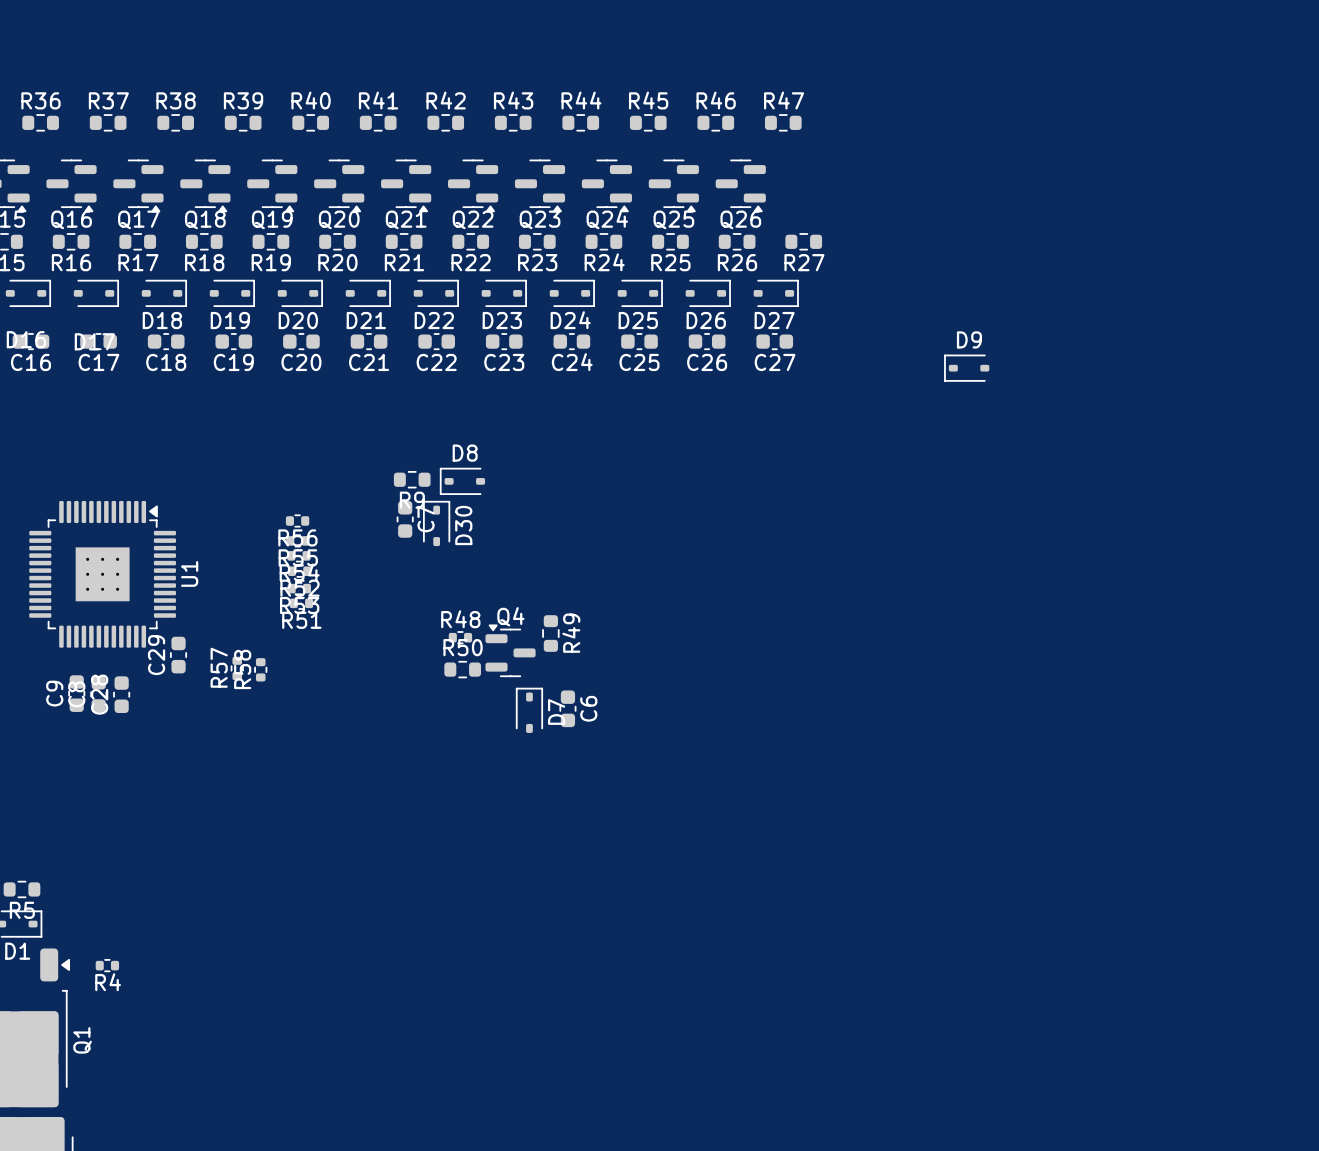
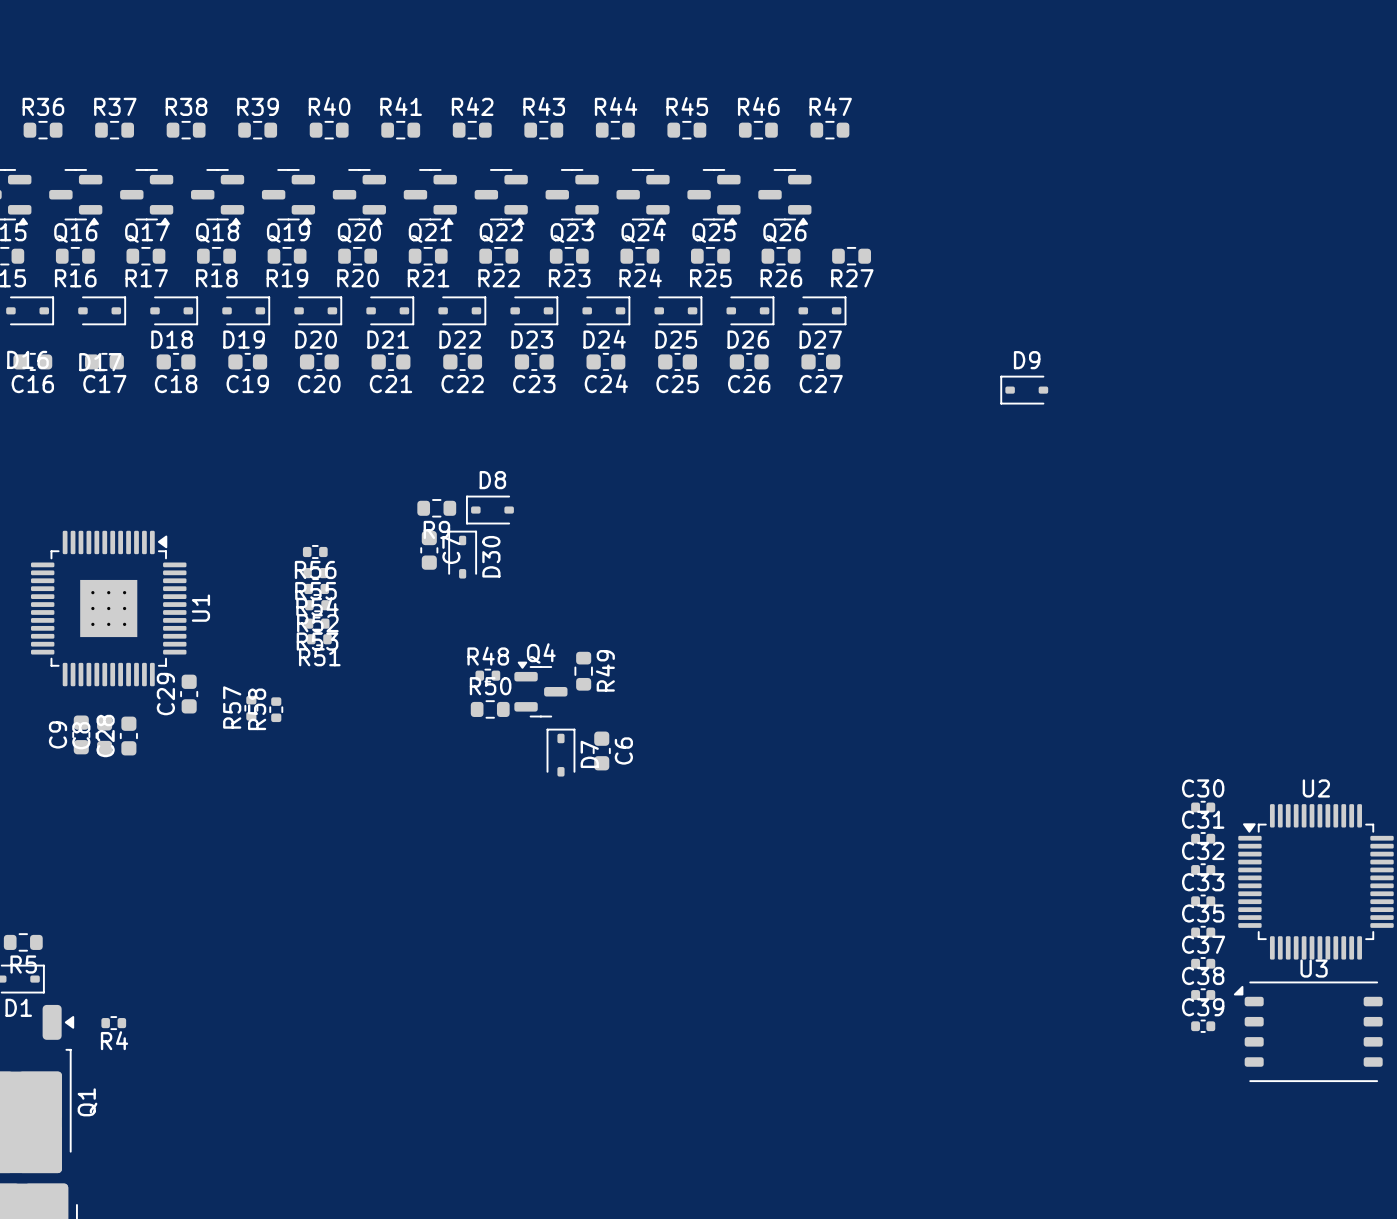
C30: none -> (1203, 807)
C31: none -> (1203, 838)
C32: none -> (1203, 869)
U2: none -> (1315, 881)
C33: none -> (1203, 901)
C35: none -> (1203, 932)
C37: none -> (1203, 963)
C38: none -> (1203, 994)
C39: none -> (1203, 1026)
U3: none -> (1308, 1031)

